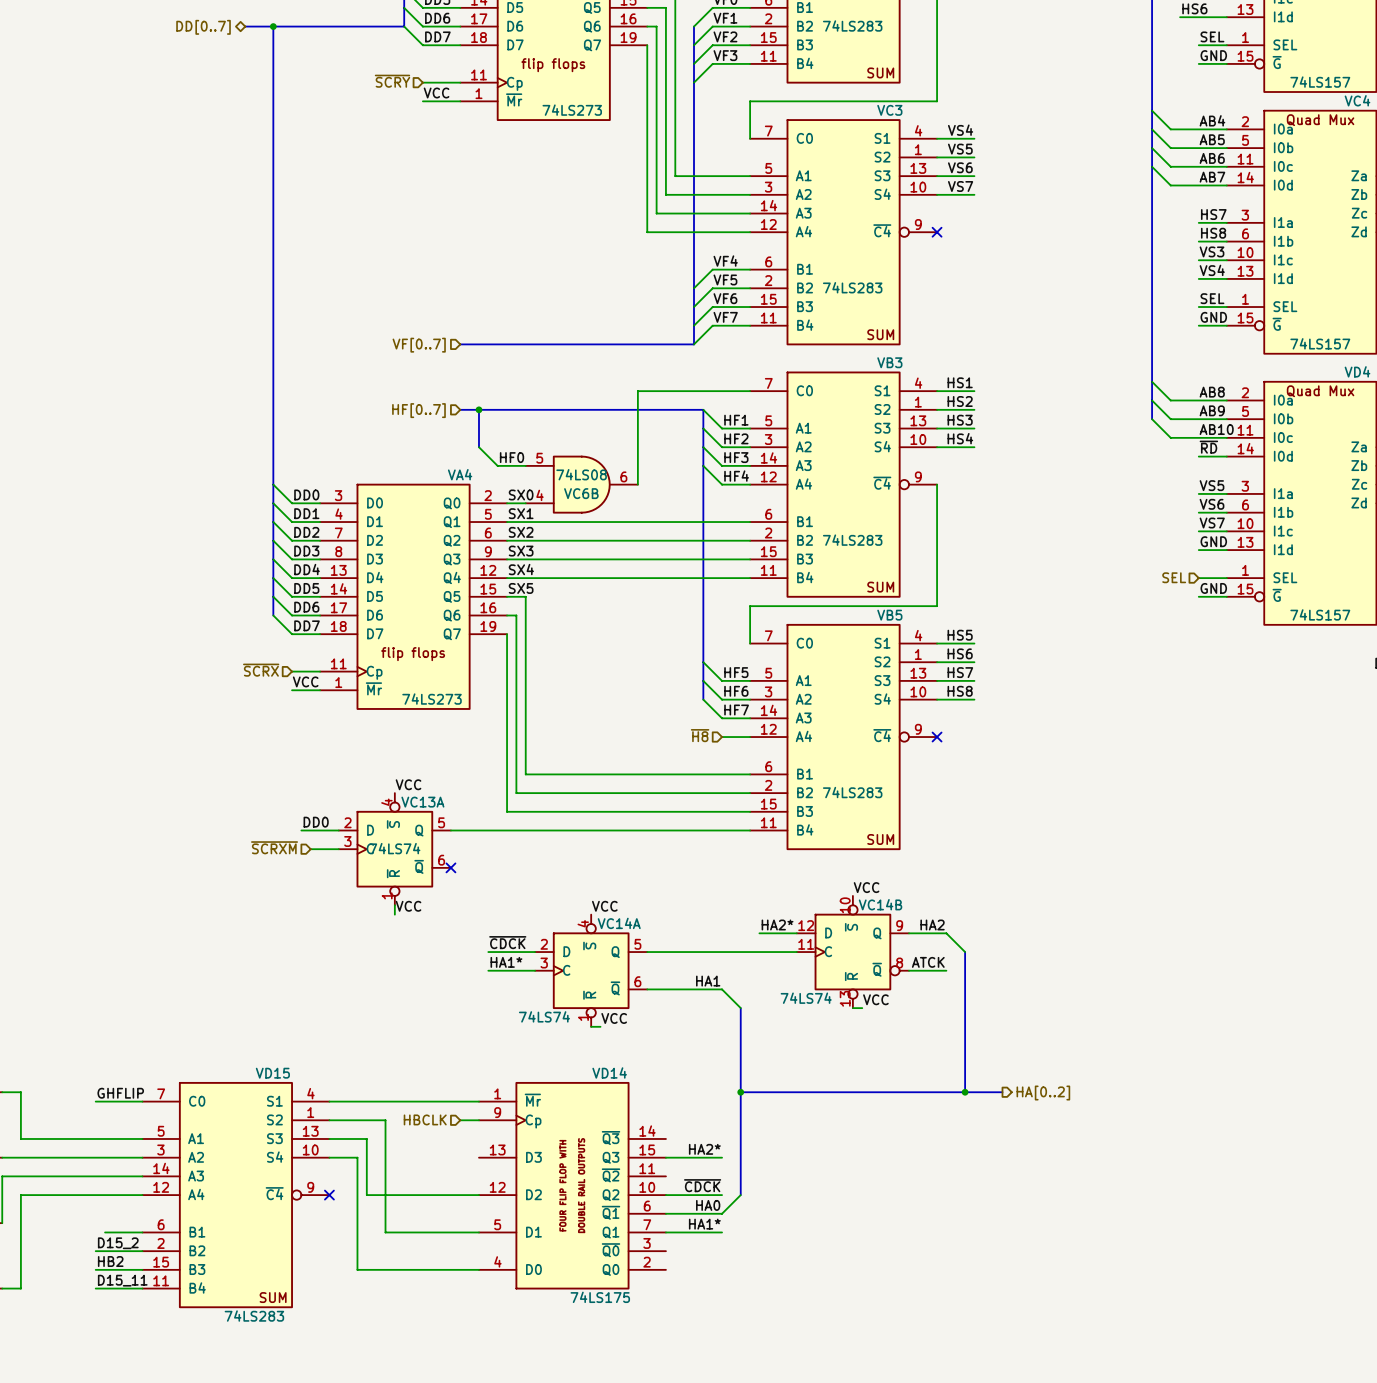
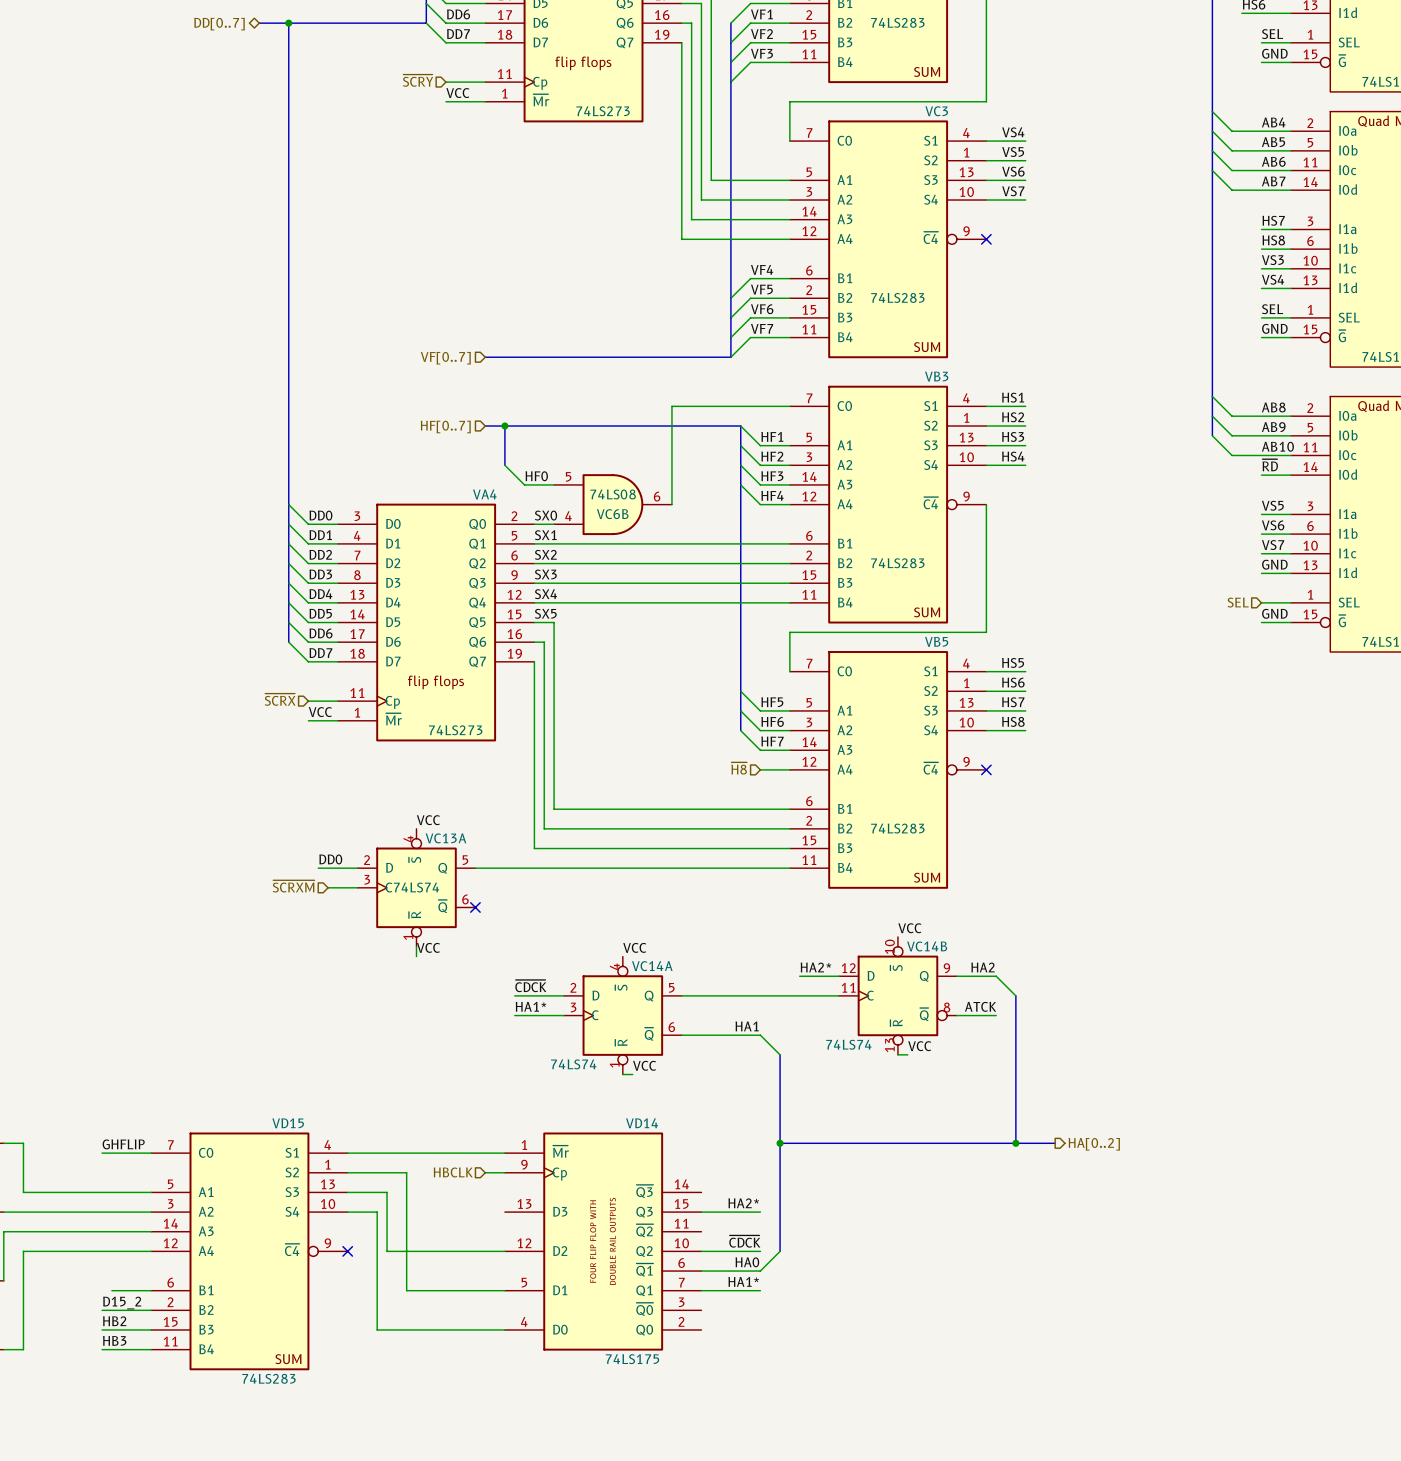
label: D15_11 (122, 1280) -> HB3 (114, 1340)

